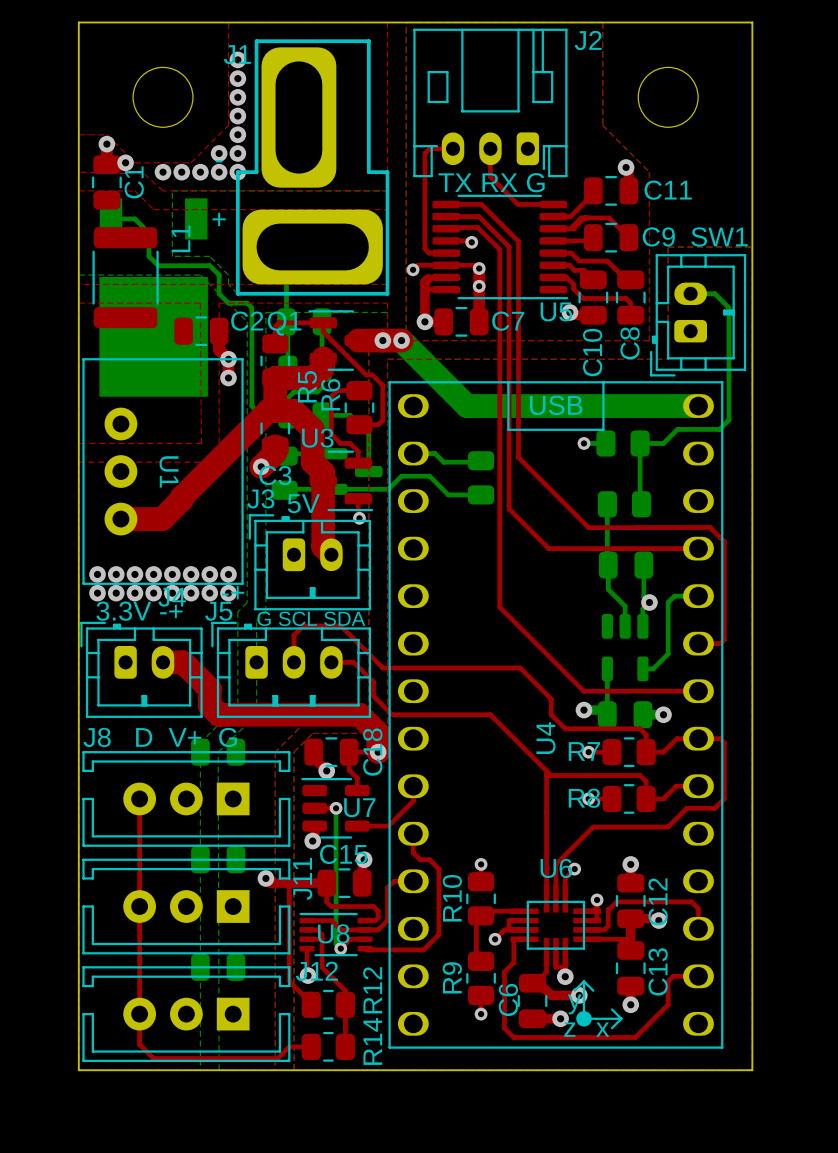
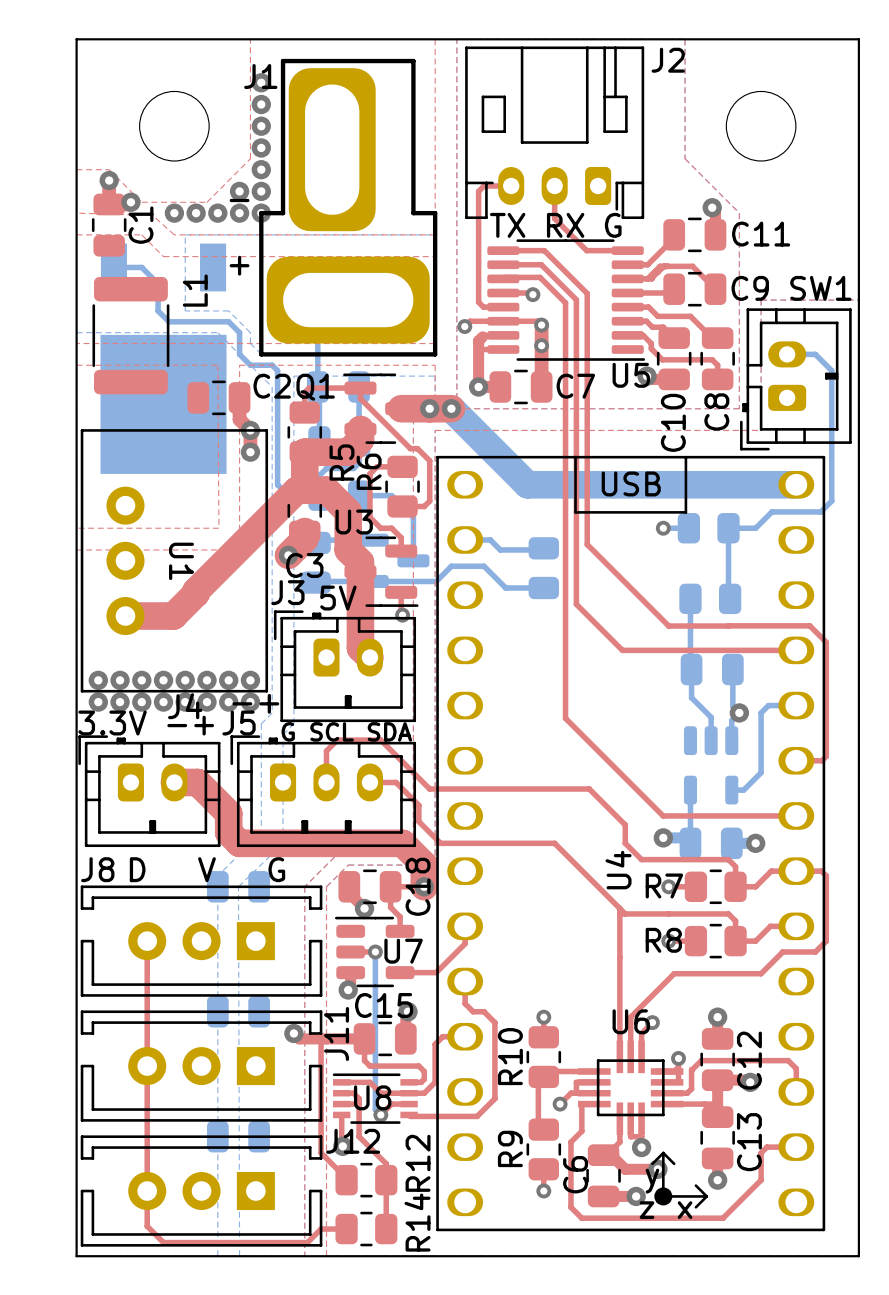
text: D V+ G (186, 737) -> D V G (207, 869)

